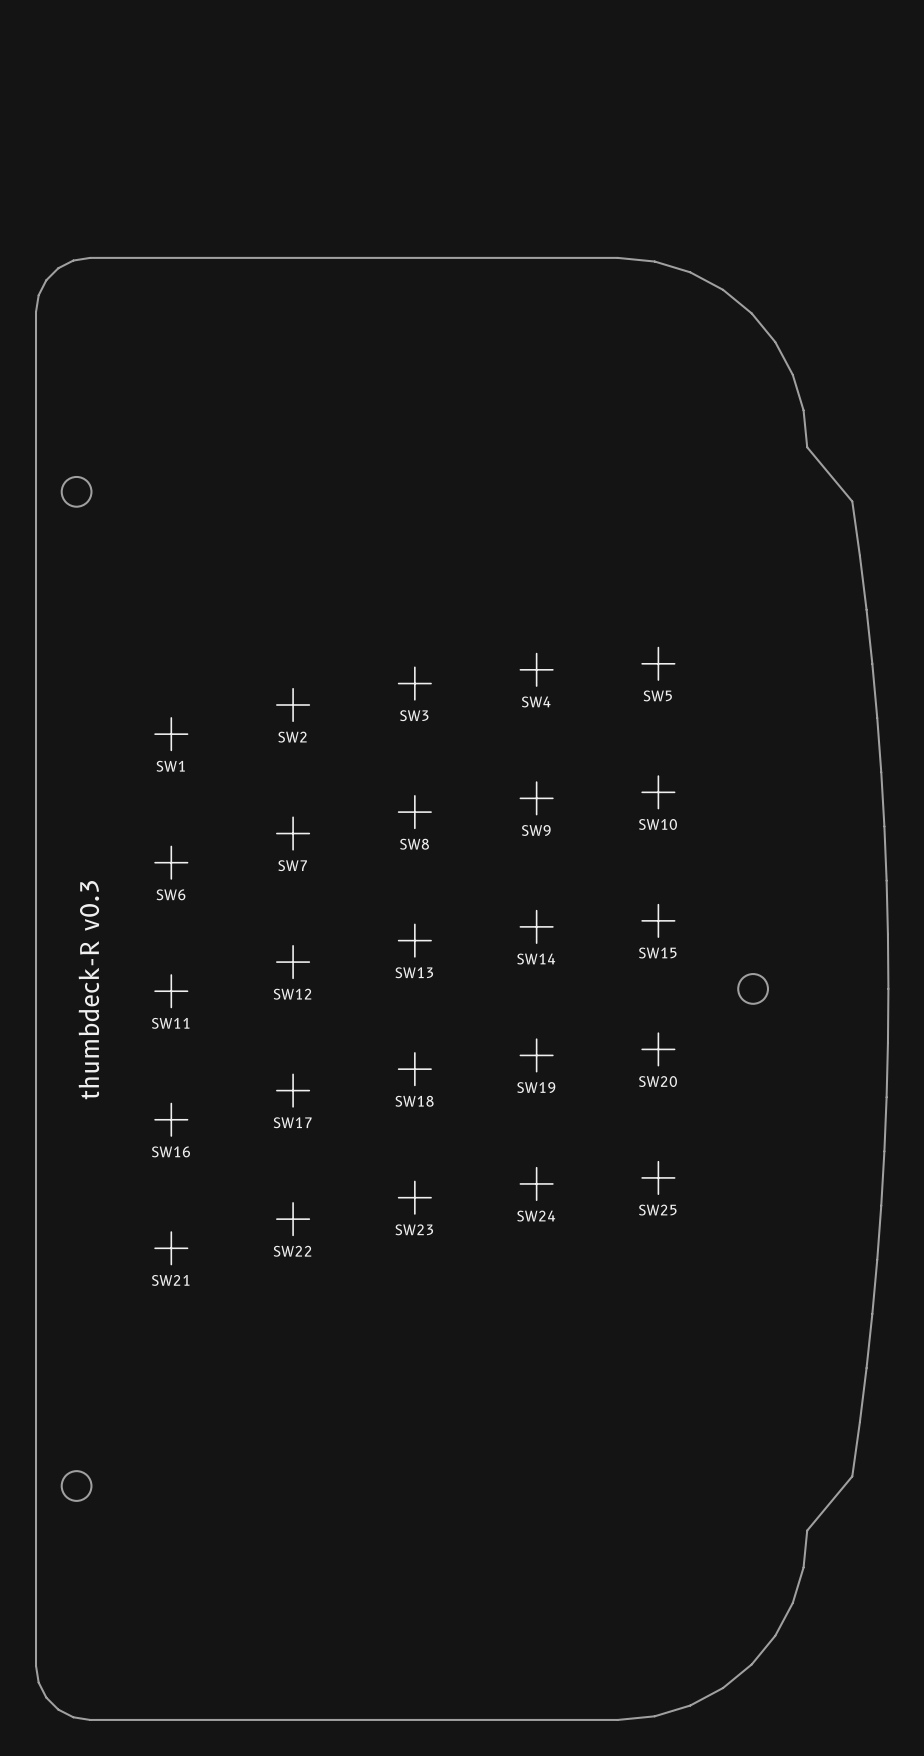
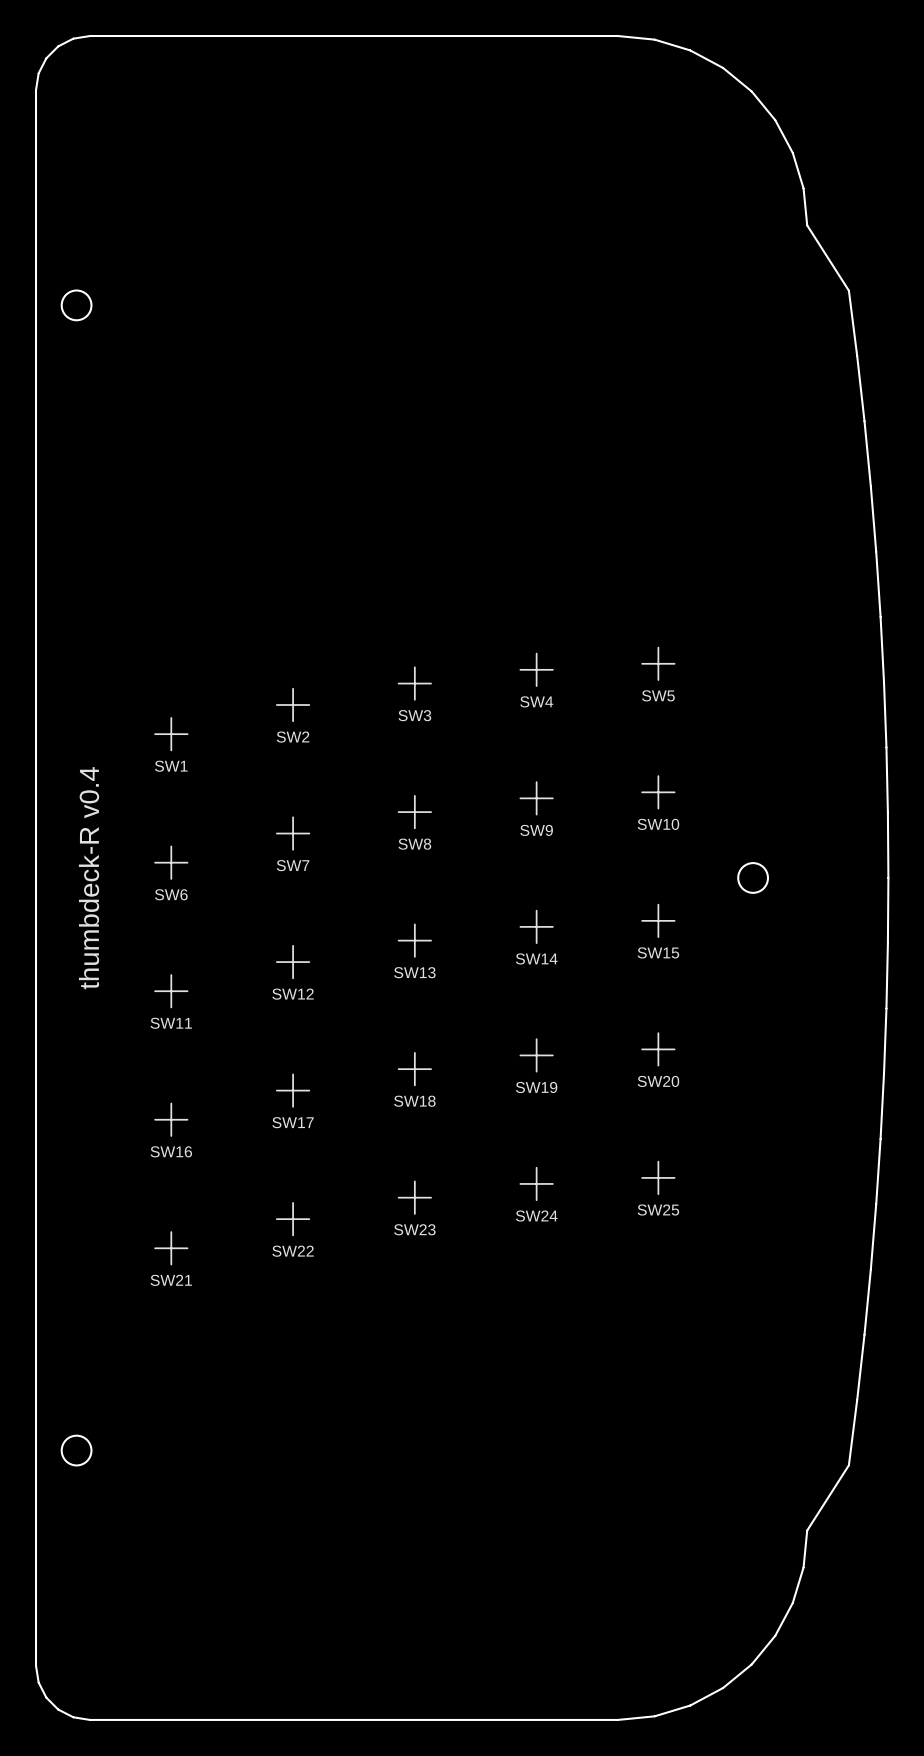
board edge: (36, 312) (38, 295) (46, 280) (58, 268) (73, 260) (90, 257) (617, 257) (654, 261) (690, 272) (723, 289) (751, 313) (775, 342) (792, 374) (803, 410) (807, 447) (852, 501) (866, 609) (877, 718) (886, 880) (888, 988) (884, 1151) (877, 1259) (866, 1368) (852, 1476) (807, 1530) -> (36, 312) (36, 90) (38, 73) (46, 58) (58, 46) (73, 38) (90, 36) (617, 36) (654, 39) (690, 50) (723, 67) (751, 91) (775, 120) (792, 152) (803, 188) (807, 225) (848, 290) (870, 486) (880, 616) (886, 747) (888, 877) (884, 1073) (876, 1204) (864, 1334) (848, 1465) (807, 1530)
round board edge position: (76, 491) -> (76, 305)
round board edge position: (753, 988) -> (753, 877)
text: thumbdeck-R v0.3 (88, 990) -> thumbdeck-R v0.4 (89, 878)
round board edge position: (76, 1486) -> (76, 1450)

